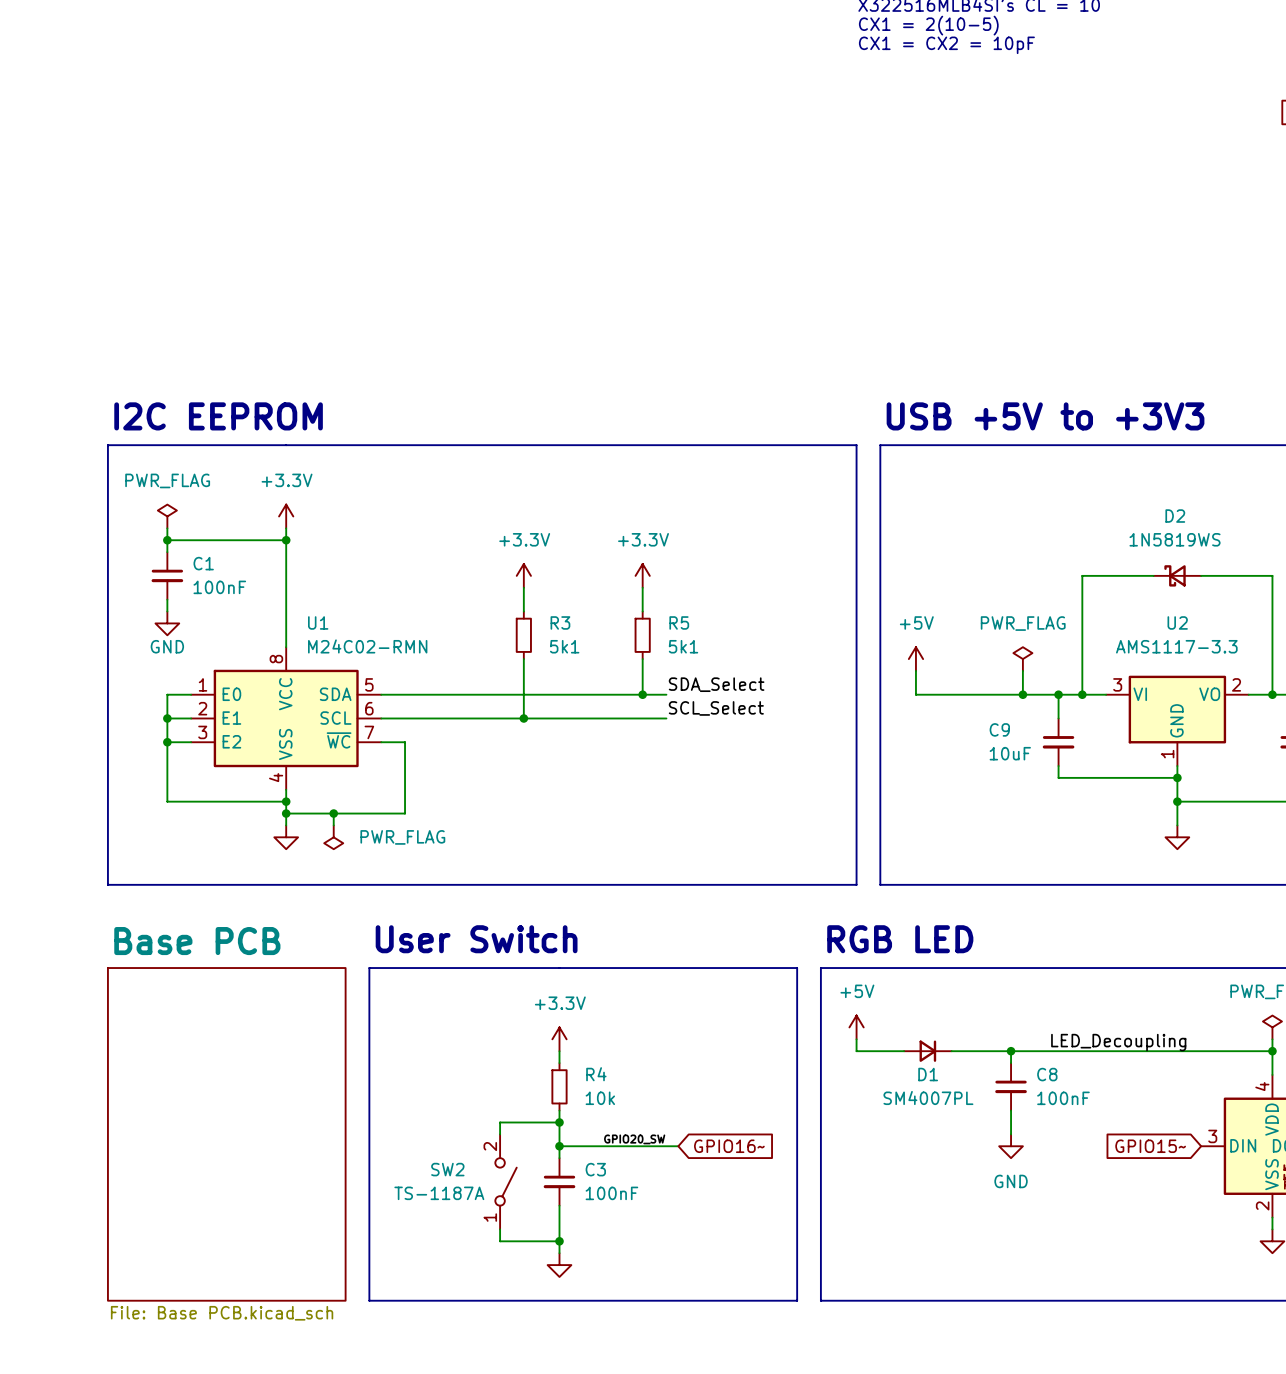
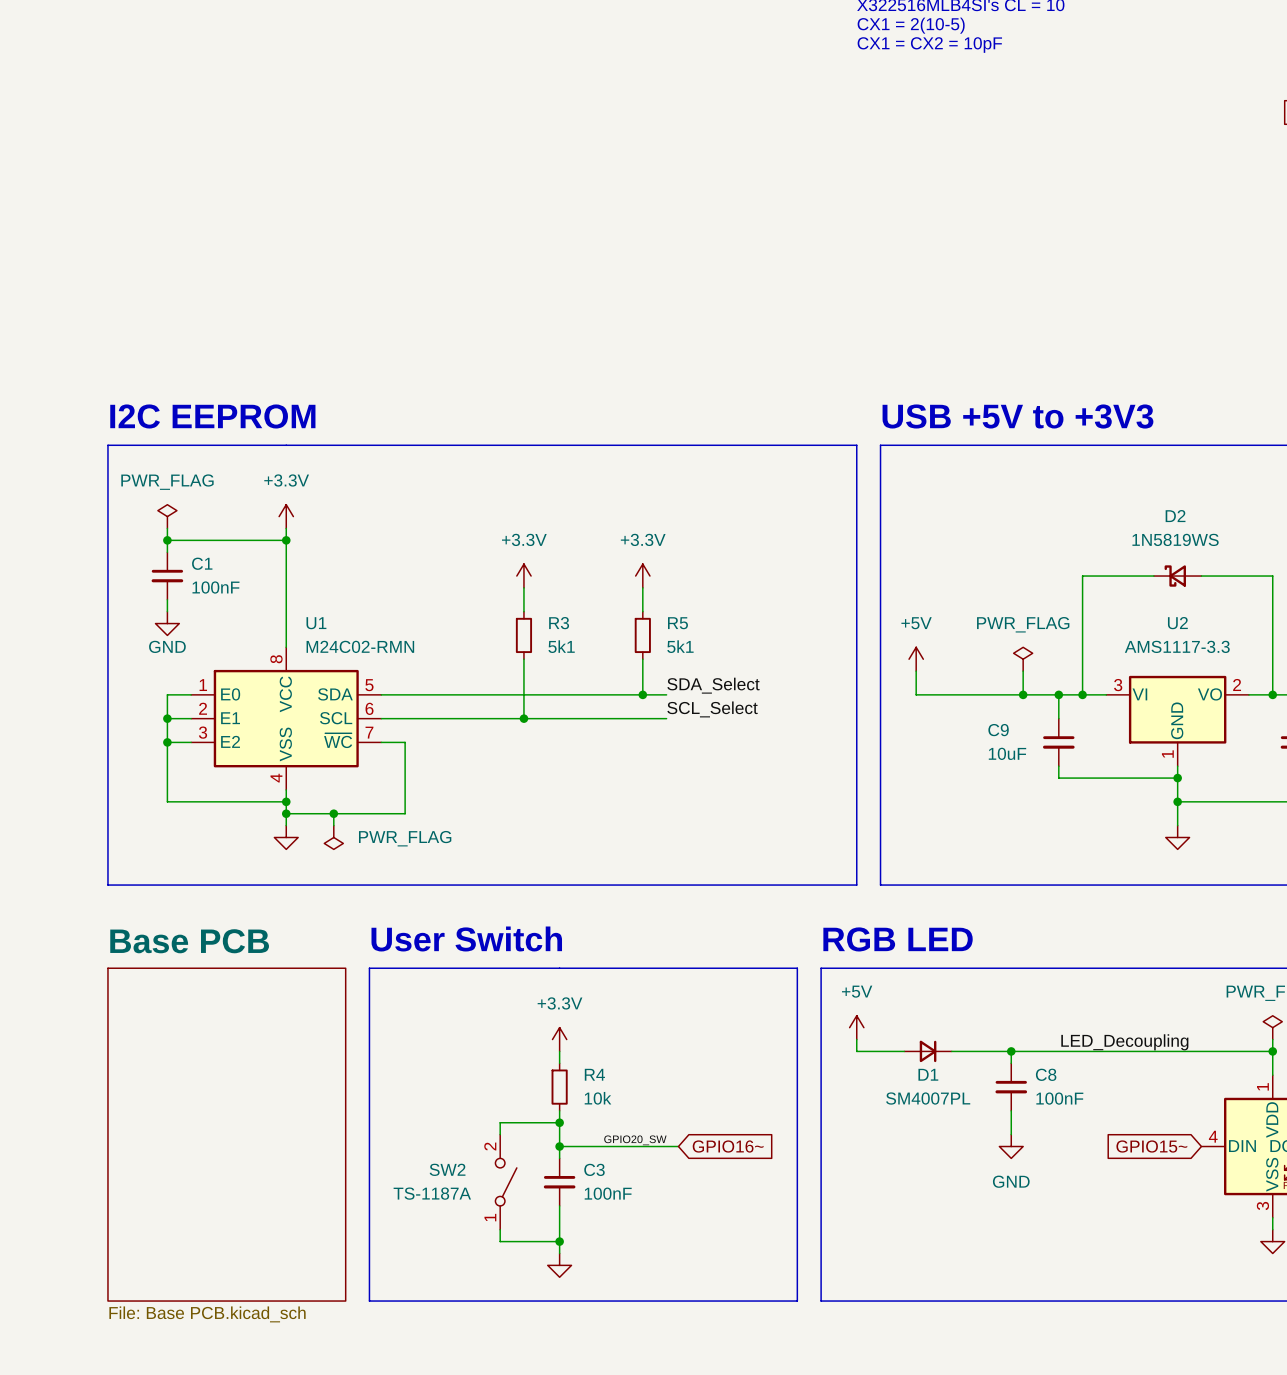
part pin number: 4 (1262, 1086) -> 1 (1262, 1086)
part pin number: 3 (1212, 1136) -> 4 (1213, 1136)
part pin number: 2 (1262, 1205) -> 3 (1262, 1205)

